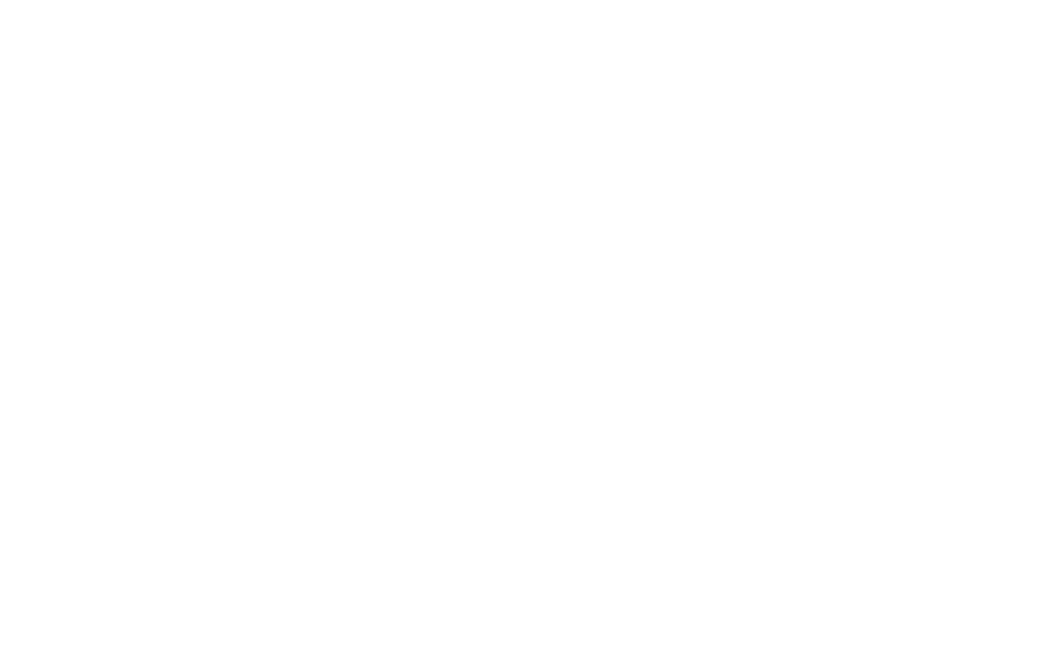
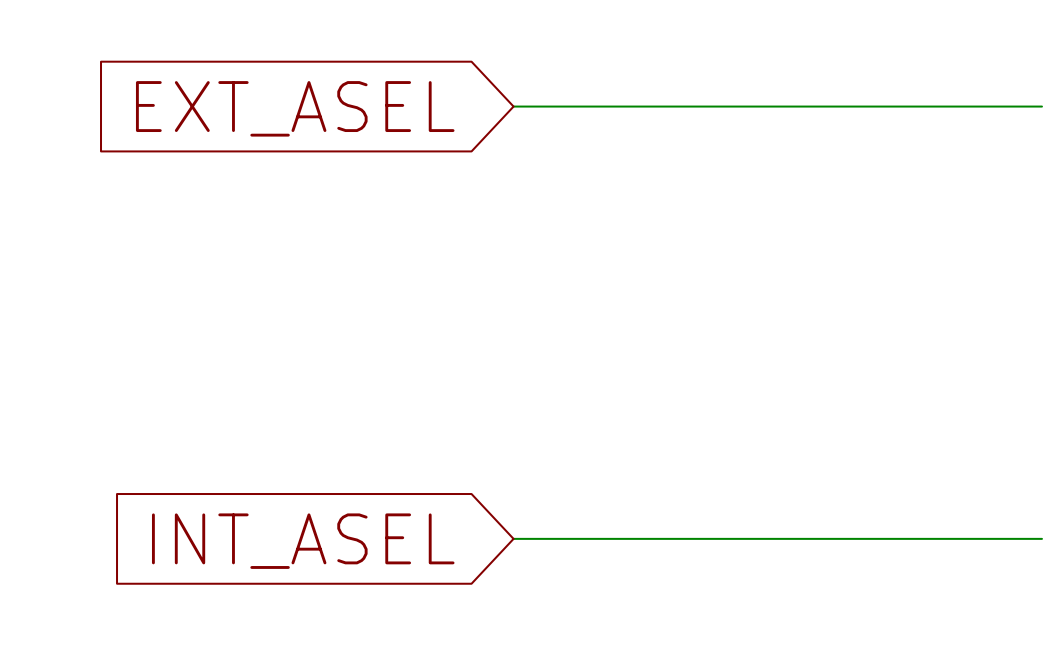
wire: none -> (513, 106) (1041, 106)
global label: none -> EXT_ASEL (295, 108)
wire: none -> (513, 538) (1041, 538)
global label: none -> INT_ASEL (303, 541)

